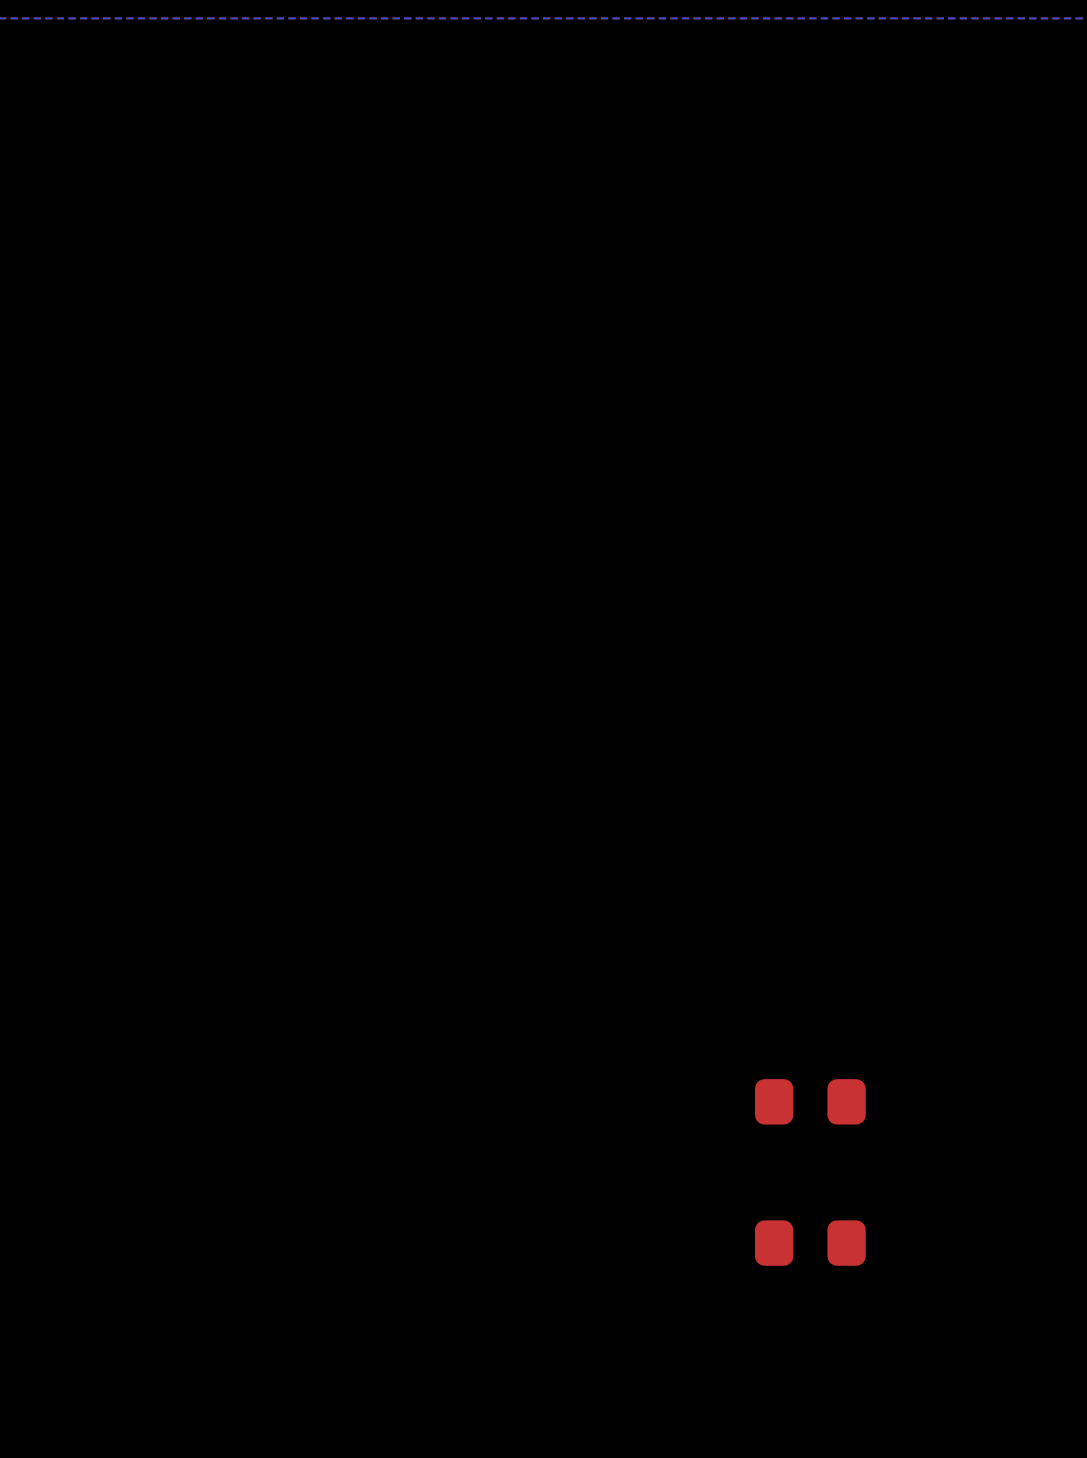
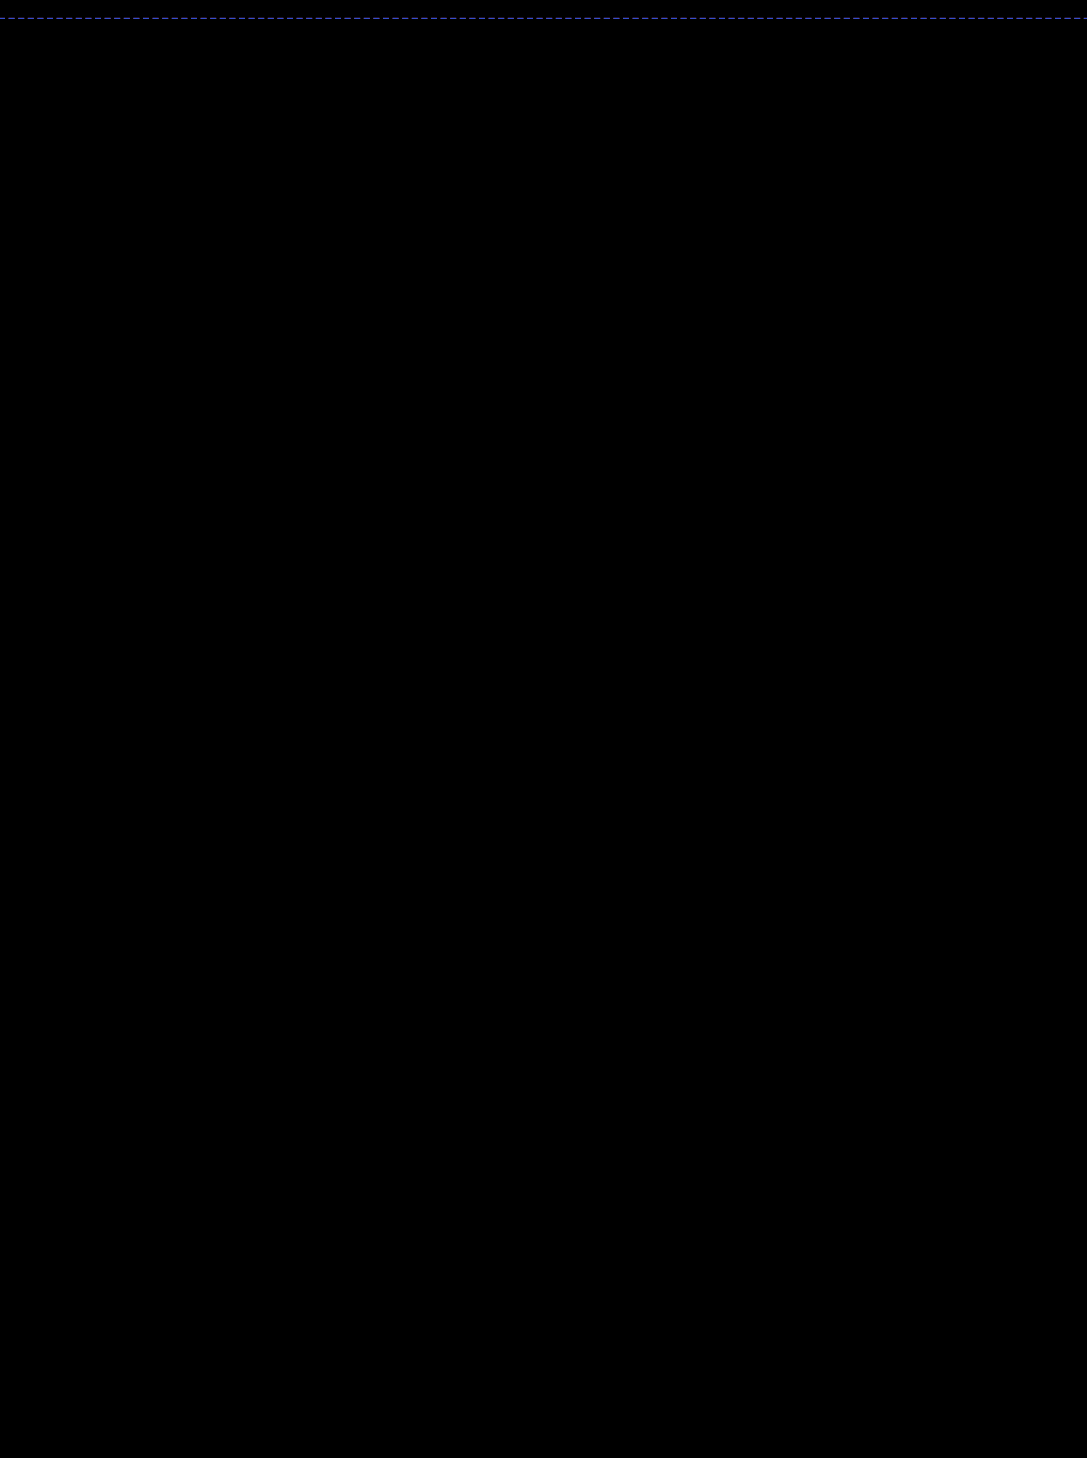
part: (810, 1101) -> none
part: (810, 1243) -> none

